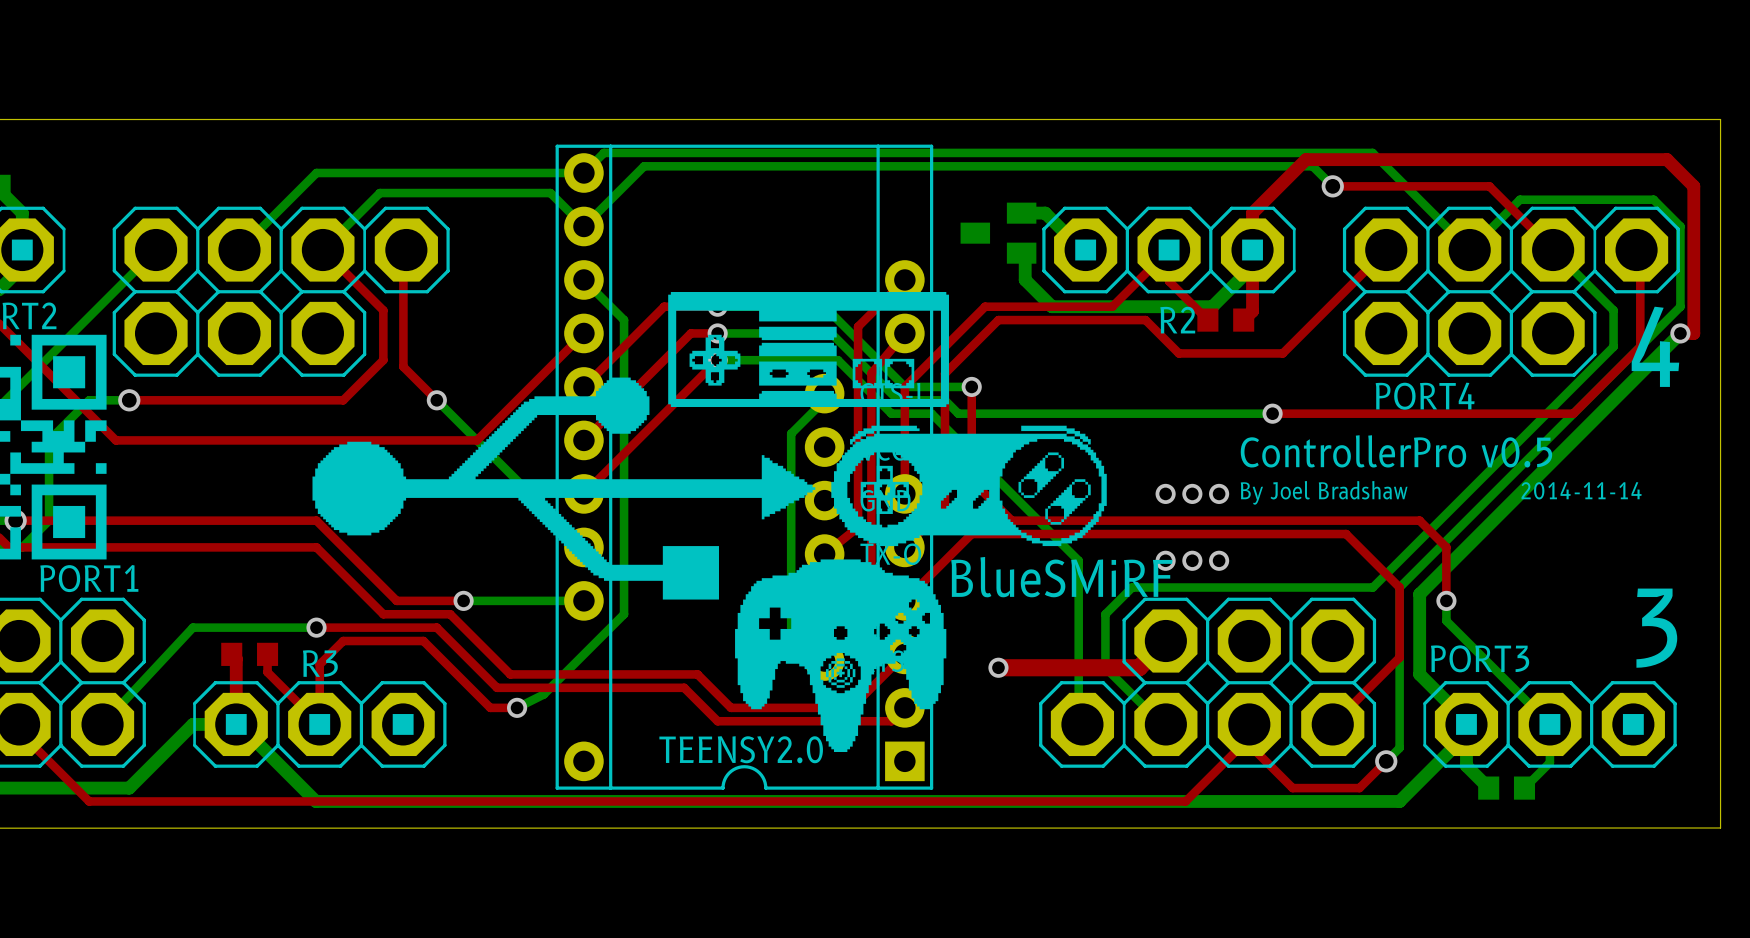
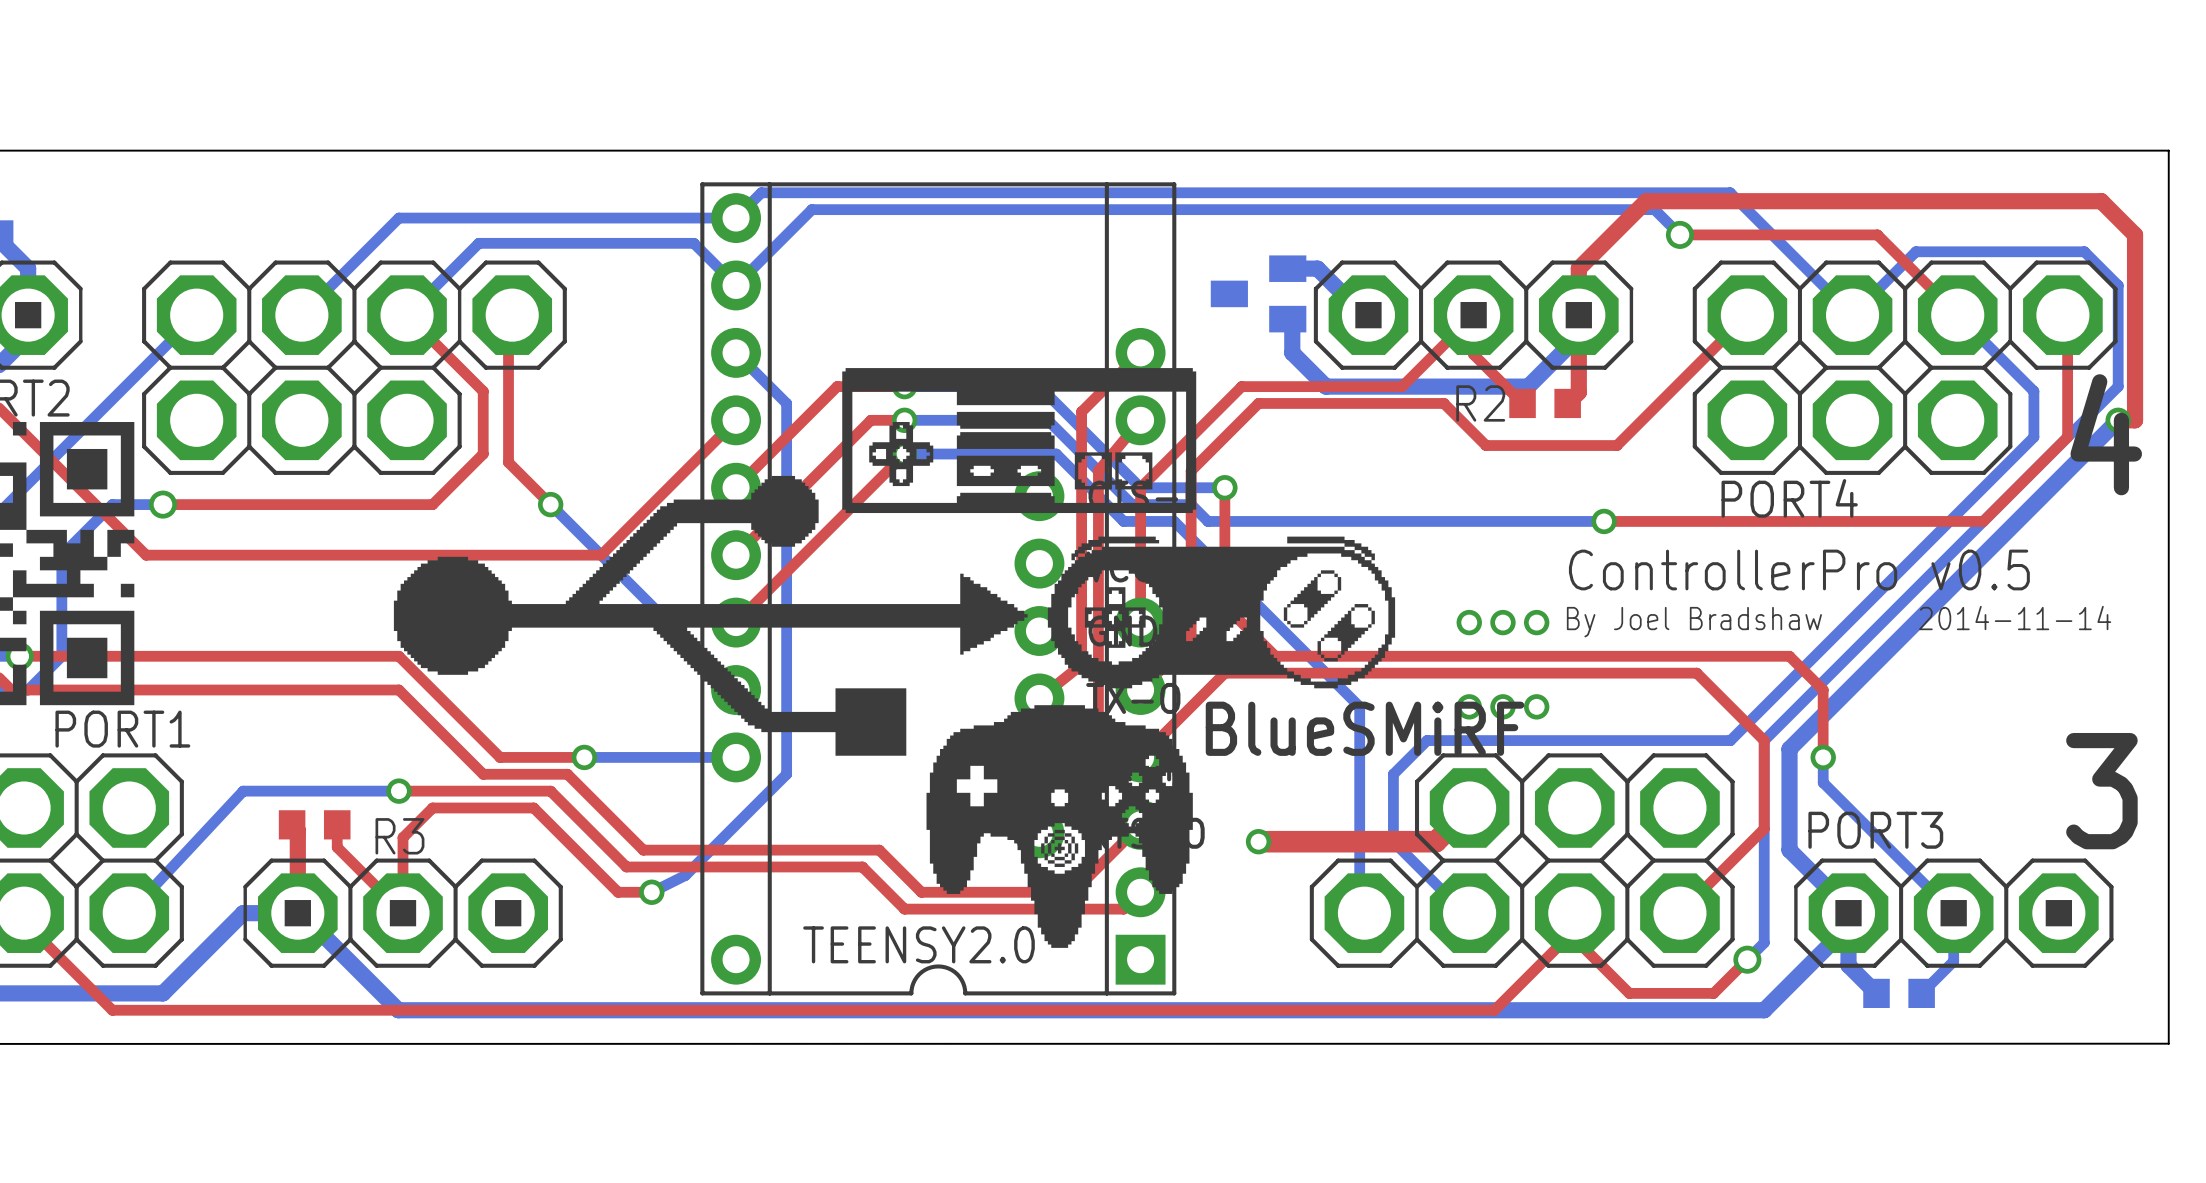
bottom track: (824, 393) (824, 400) (791, 433) (791, 627) (824, 661) -> none

